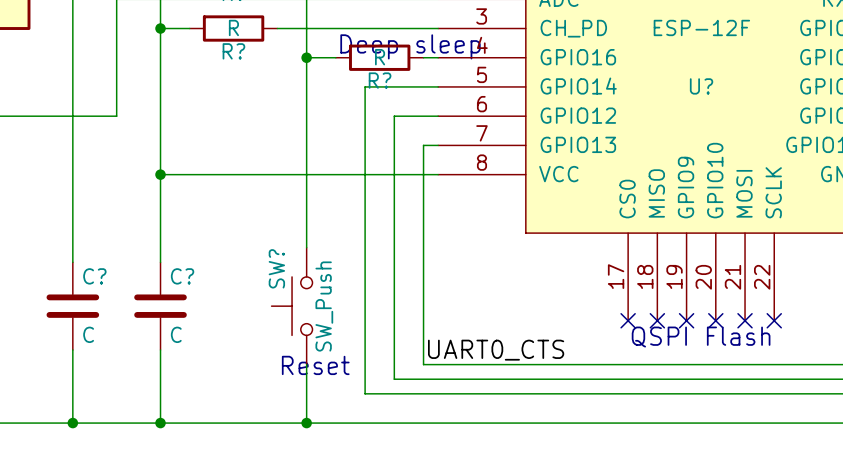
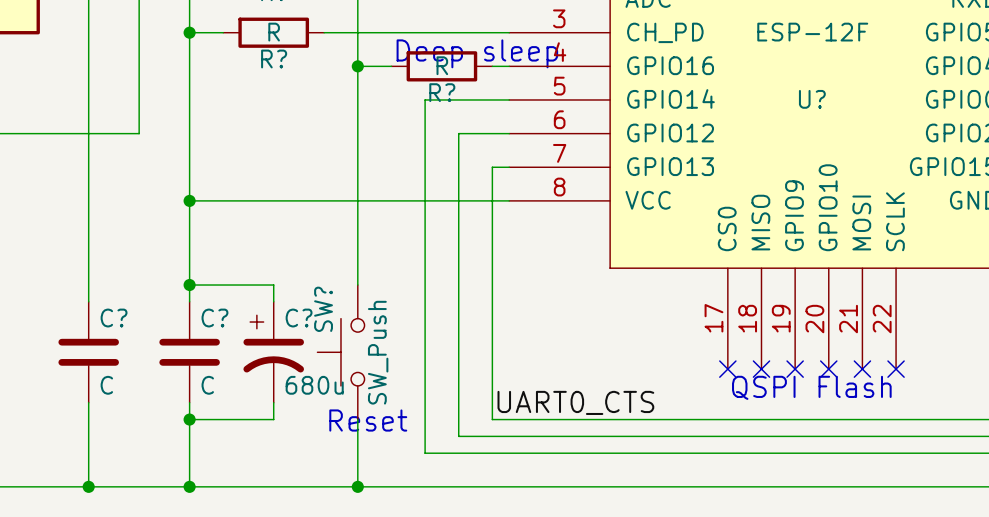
wire: none -> (189, 285) (273, 285) (273, 301)
junction: none -> (189, 285)
C?: none -> 680u (273, 352)
wire: none -> (273, 402) (273, 419) (189, 419)
junction: none -> (189, 419)

